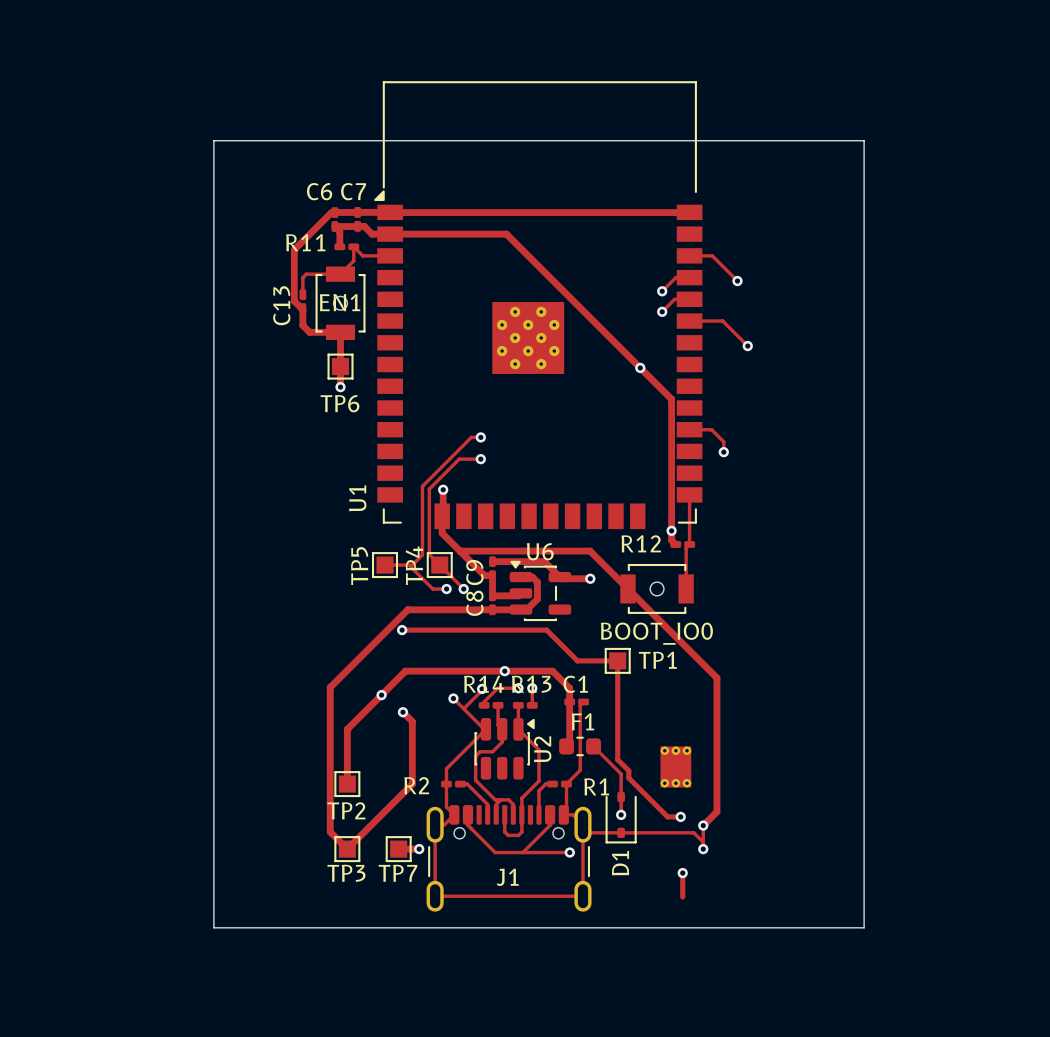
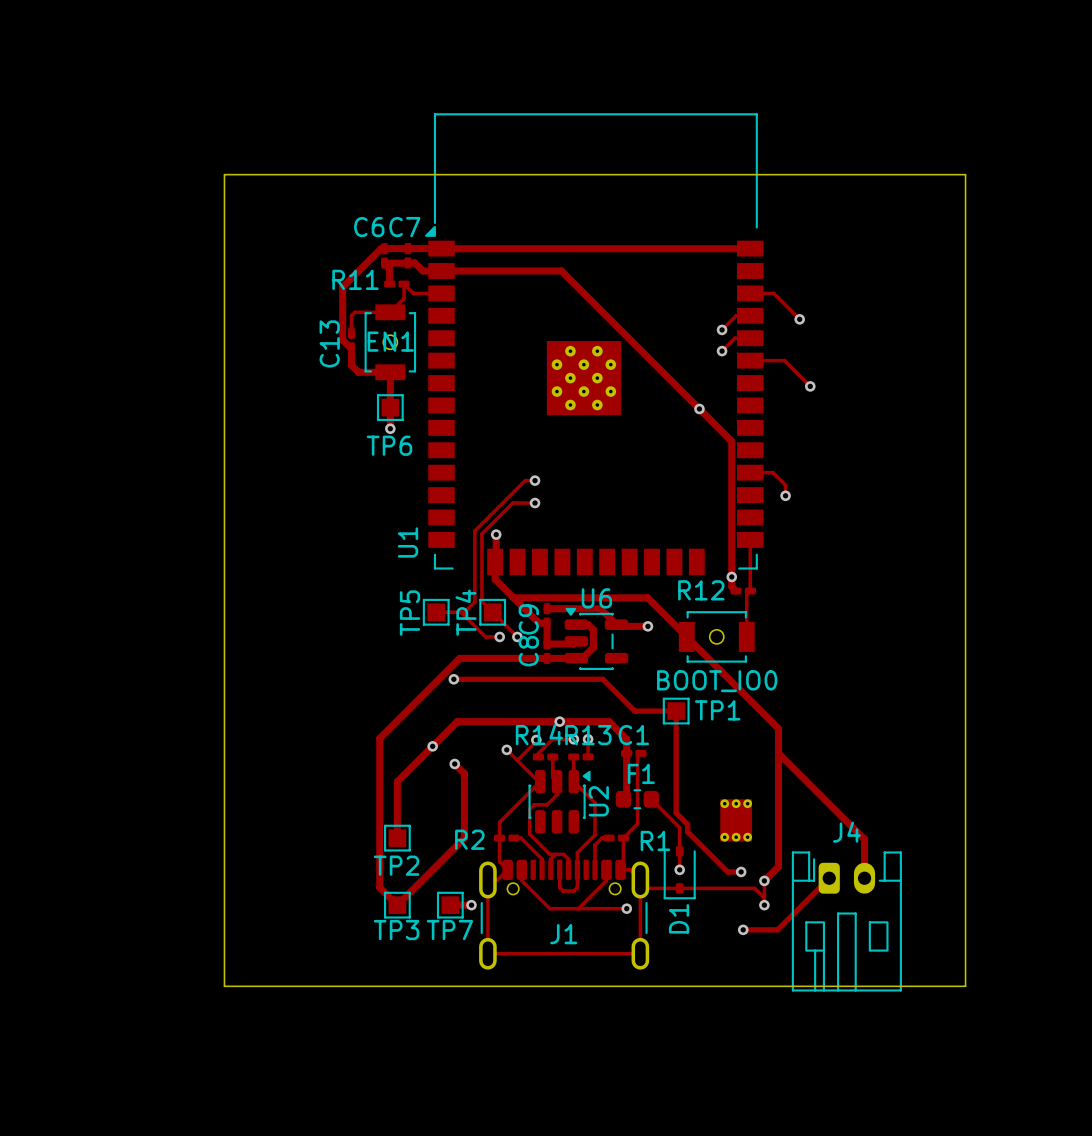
board edge: (213, 140) (213, 927) -> (259, 174) (224, 174) (224, 986) (259, 986)
board edge: (864, 140) (864, 927) -> (930, 174) (965, 174) (965, 986) (930, 986)
track: none -> (778, 753) (864, 839) (864, 878)
J4: none -> (846, 921)
track: (682, 873) (682, 897) -> (743, 929) (777, 929) (829, 878)

